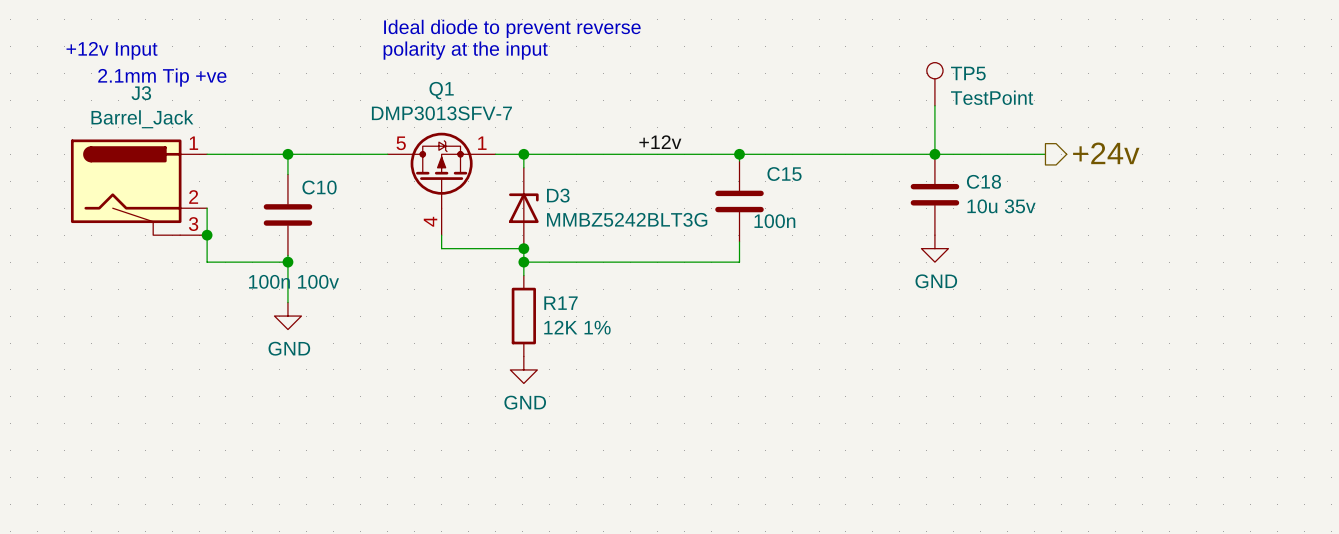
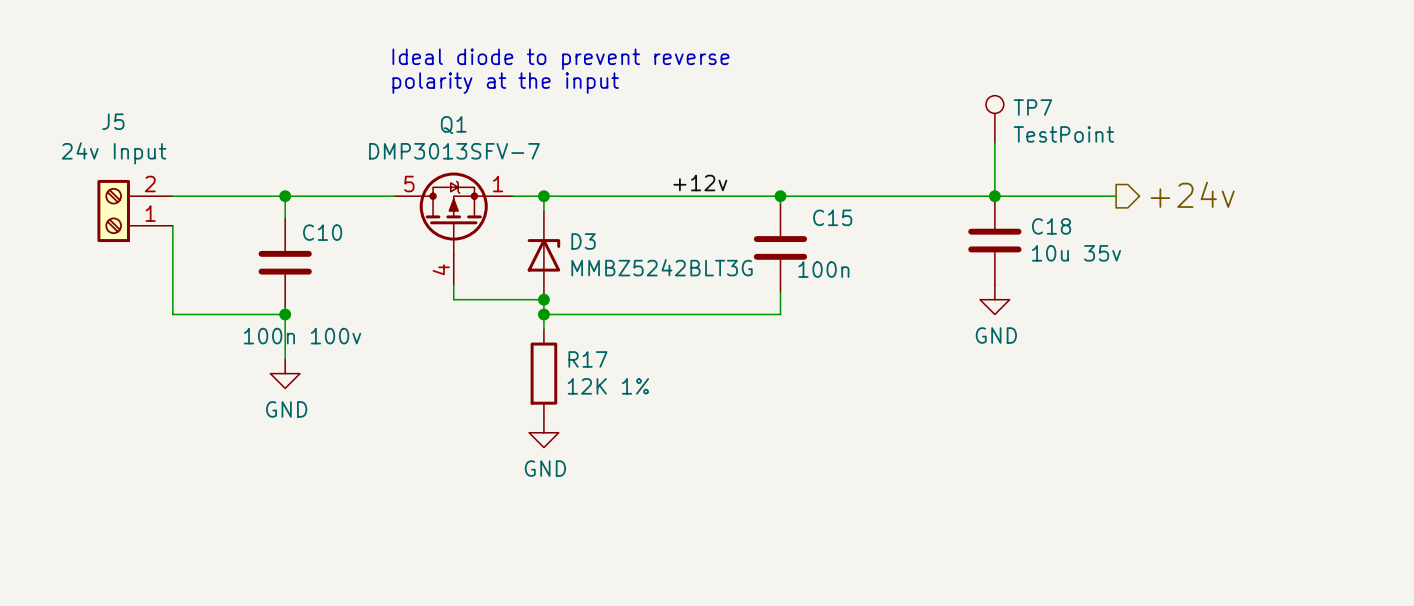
text: +12v Input (112, 50) -> none
TP5 name: TP5 (968, 73) -> TP7 (1032, 107)
text: 2.1mm Tip +ve (162, 77) -> none
J5: none -> 24v Input (135, 210)
J3: Barrel_Jack (139, 187) -> none
wire: (207, 208) (207, 262) -> (172, 225) (172, 314) (196, 314)
junction: (207, 235) -> none

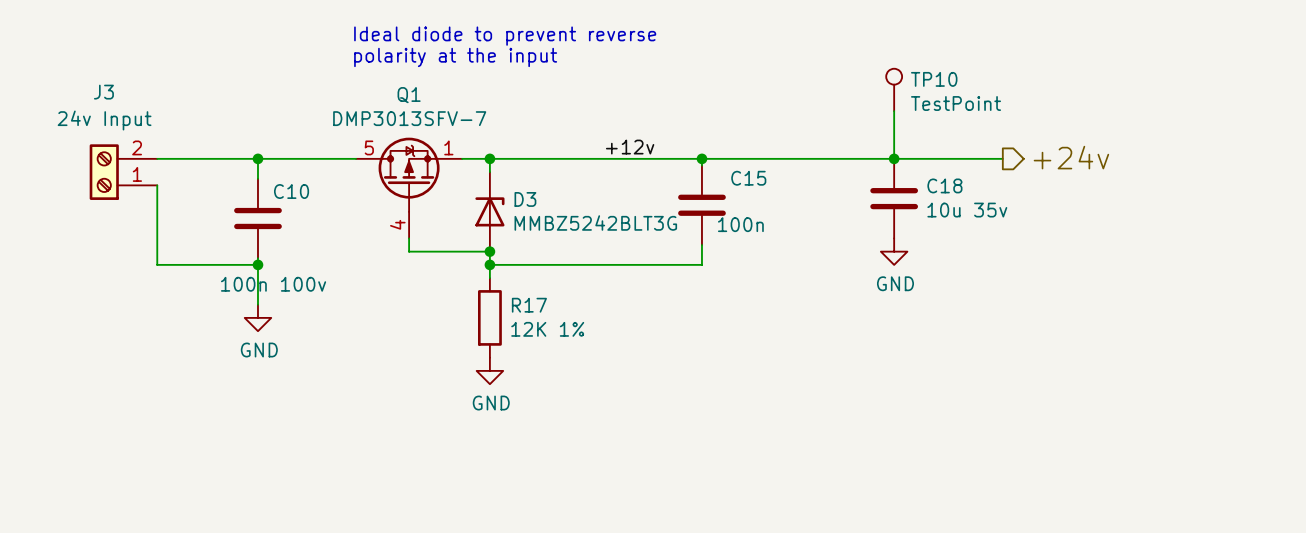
TP7 name: TP7 (1032, 107) -> TP10 (934, 79)
J5 name: J5 (113, 121) -> J3 (103, 92)

